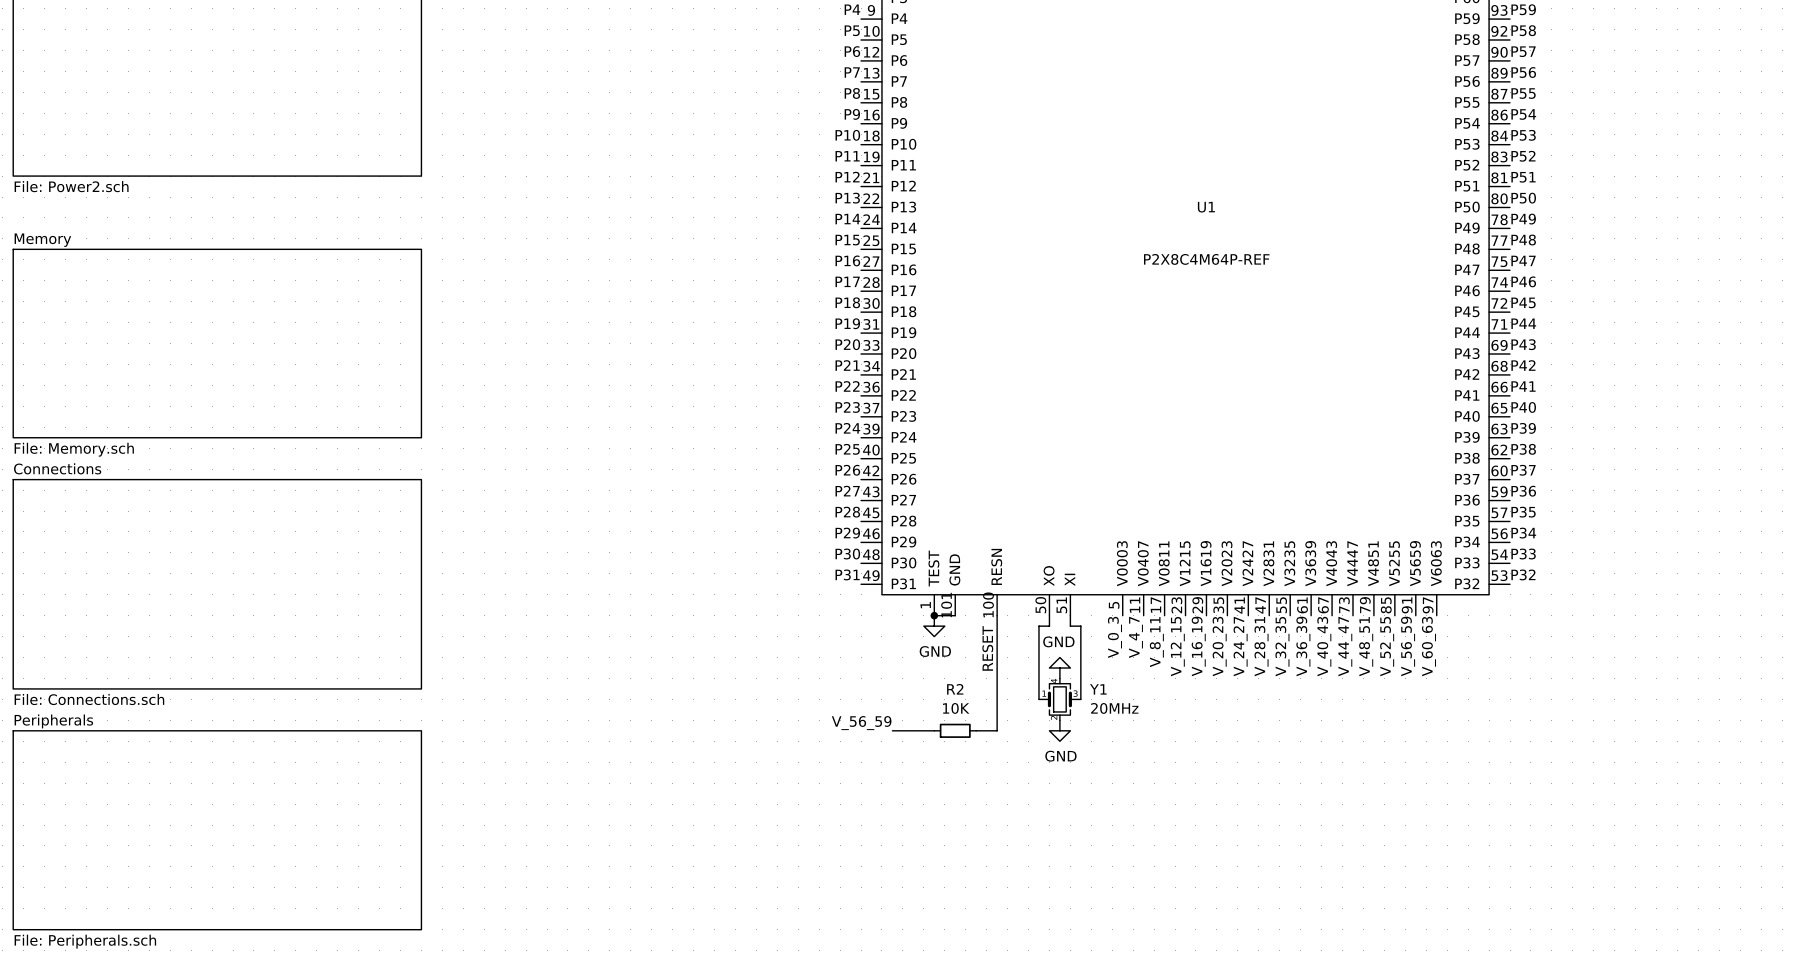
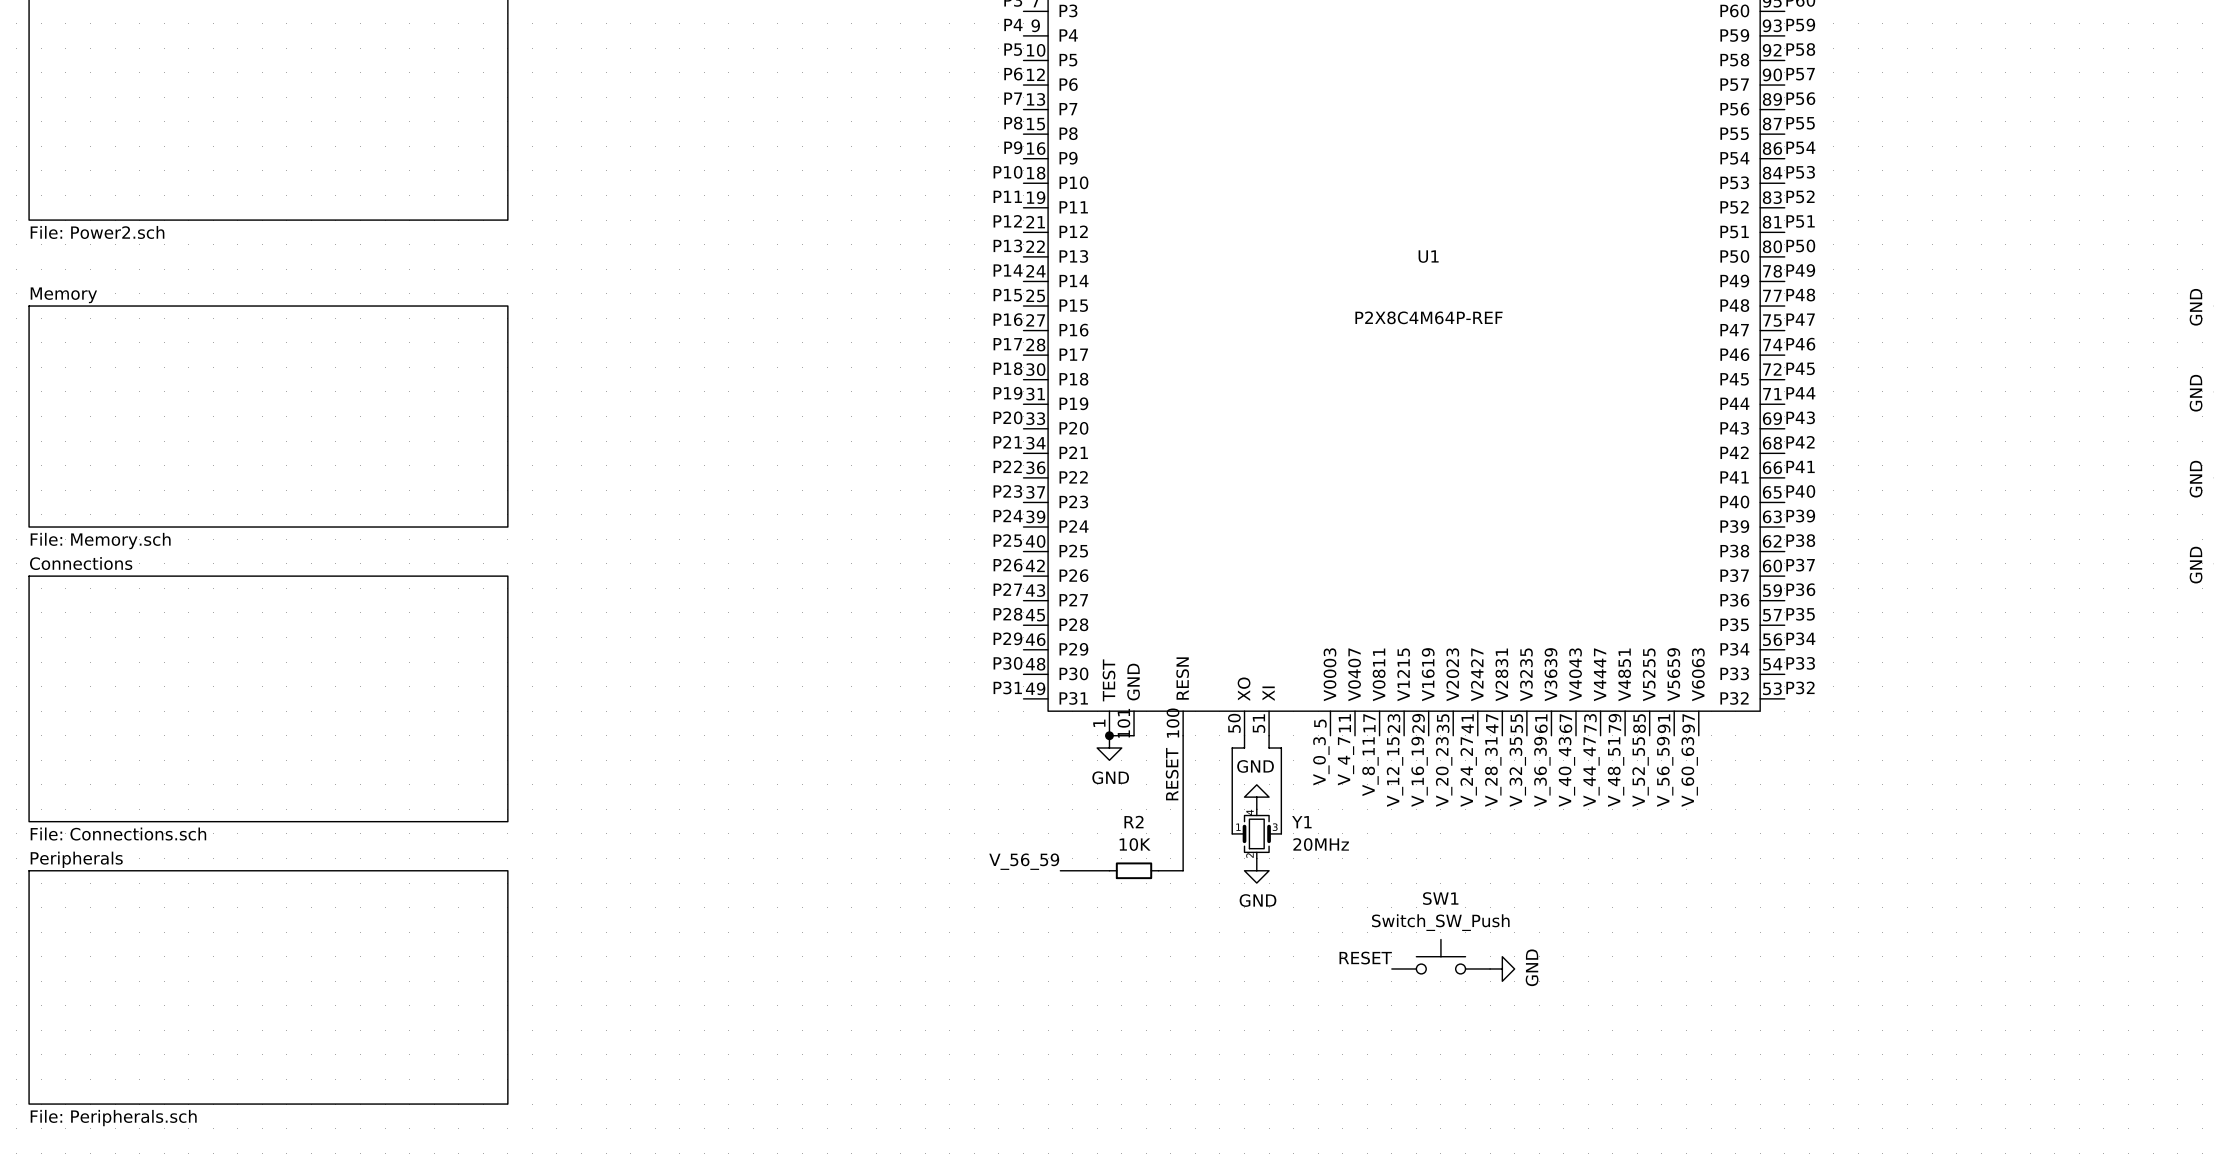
SW1: none -> Switch_SW_Push (1440, 956)
label: none -> RESET (1365, 958)
power symbol: none -> GND (1502, 968)

